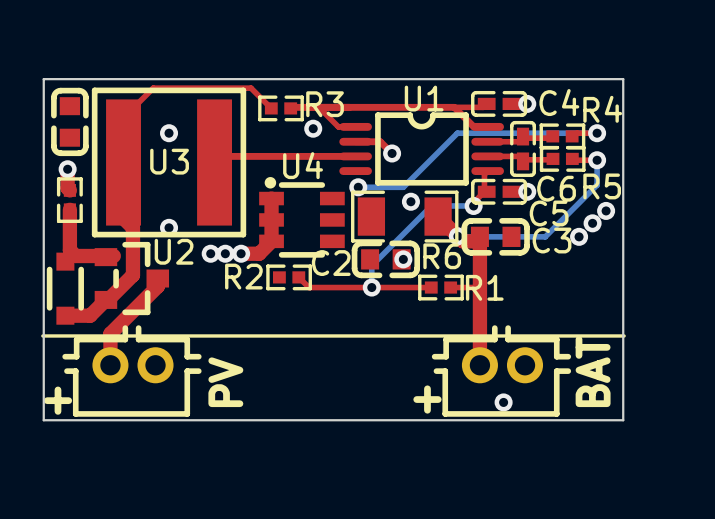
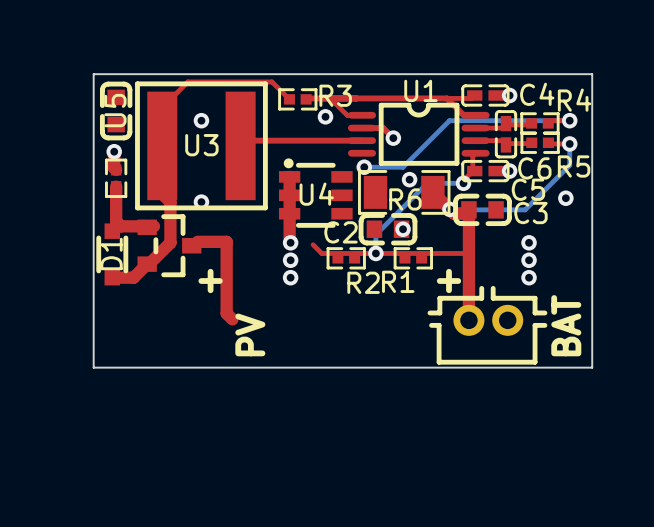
U5 name: none -> U5 (115, 110)
U4 name position: U4 (303, 165) -> U4 (316, 194)
via: (606, 210) -> none
via: (579, 236) -> none
top track: (271, 241) (259, 253) (241, 253) -> (289, 213) (290, 242)
U2 name: U2 (174, 251) -> none
via: (210, 253) -> none
via: (225, 253) -> none
via: (241, 253) -> none
R6 name position: R6 (442, 256) -> R6 (405, 199)
top track: none -> (197, 241) (226, 241) (226, 313) (232, 319)
via: none -> (290, 242)
via: none -> (529, 242)
R2 name position: R2 (243, 276) -> R2 (363, 282)
R2 position: (289, 277) -> (346, 258)
top track: (157, 278) (157, 286) (110, 333) (110, 365) -> none
top track: none -> (427, 253) (443, 253)
R1 position: (440, 287) -> (413, 258)
R1 name position: R1 (484, 287) -> R1 (398, 281)
D1 name: none -> D1 (111, 253)
via: none -> (290, 260)
via: none -> (529, 260)
via: none -> (290, 277)
via: none -> (529, 277)
text: none -> + (210, 281)
line: (42, 335) (624, 335) -> none
part: (131, 371) -> none
text position: + (427, 399) -> + (449, 281)
text: + (57, 400) -> none
via: (503, 402) -> none

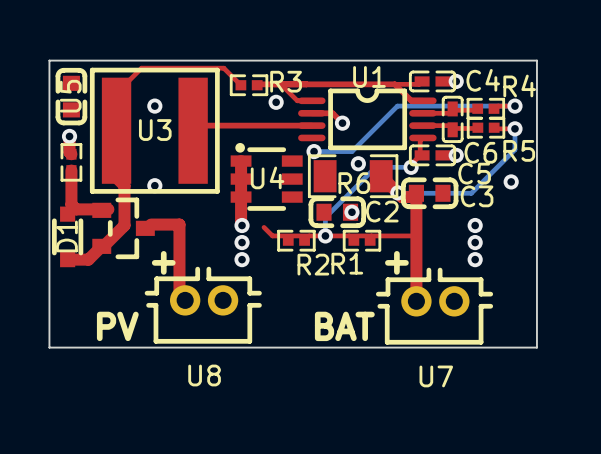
C2 name position: C2 (341, 232) -> C2 (382, 211)
U8: none -> (203, 305)
text rotation: 0° (566, 325) -> 90° clockwise (344, 326)
text position: BAT (566, 325) -> BAT (344, 326)
text rotation: 0° (250, 334) -> 90° clockwise (117, 326)
text position: PV (250, 334) -> PV (117, 326)
U7 name: none -> U7 (436, 376)

